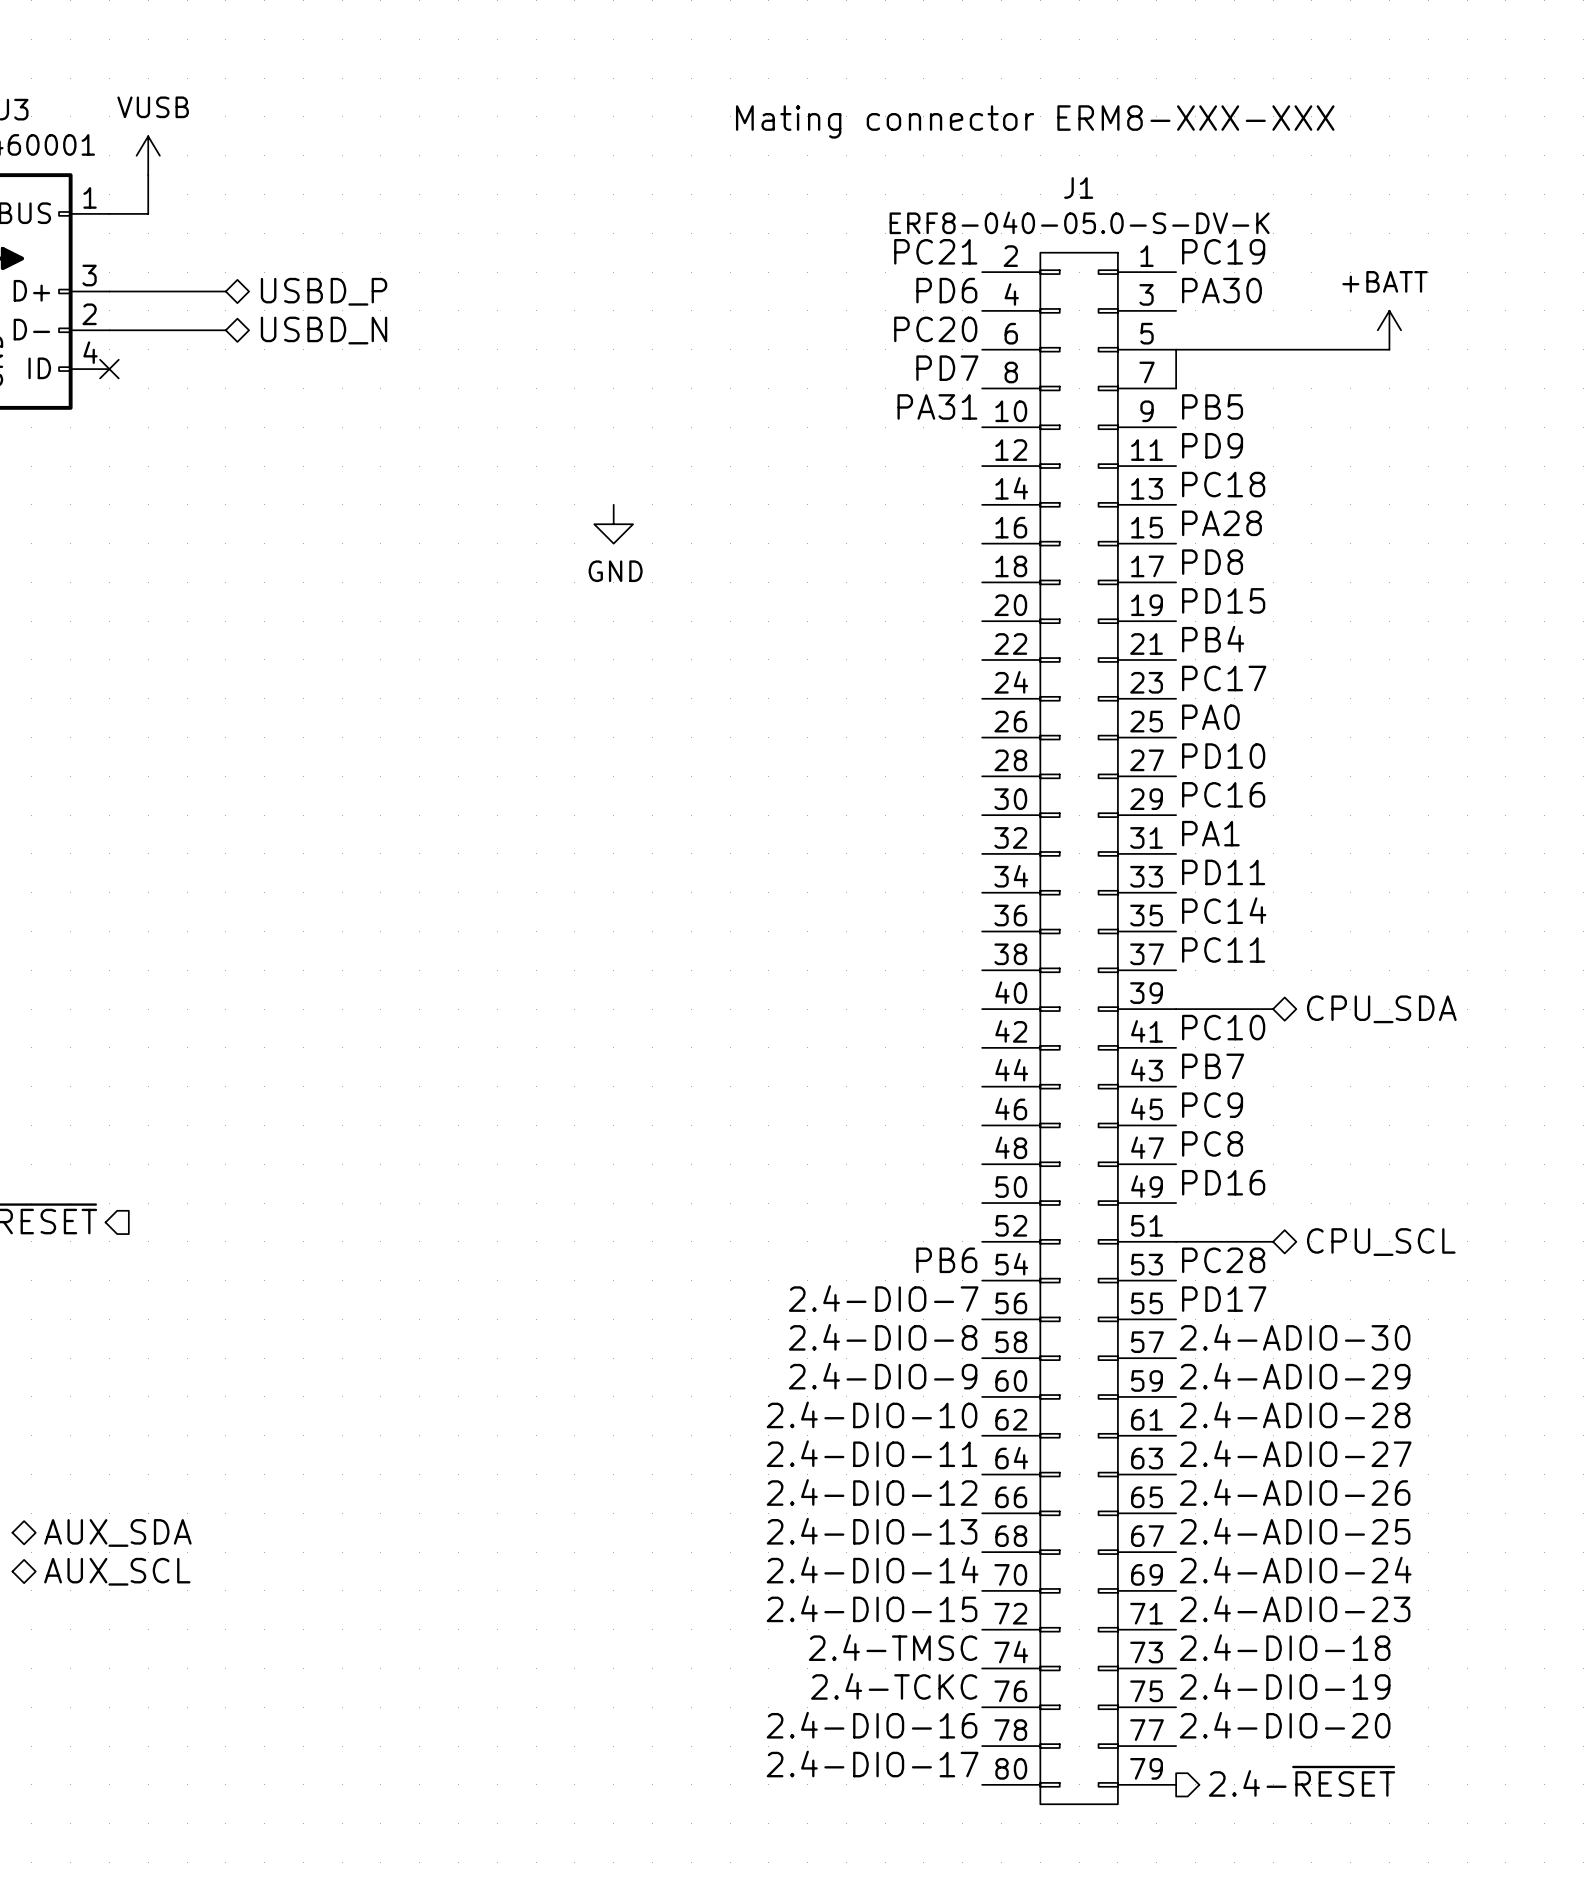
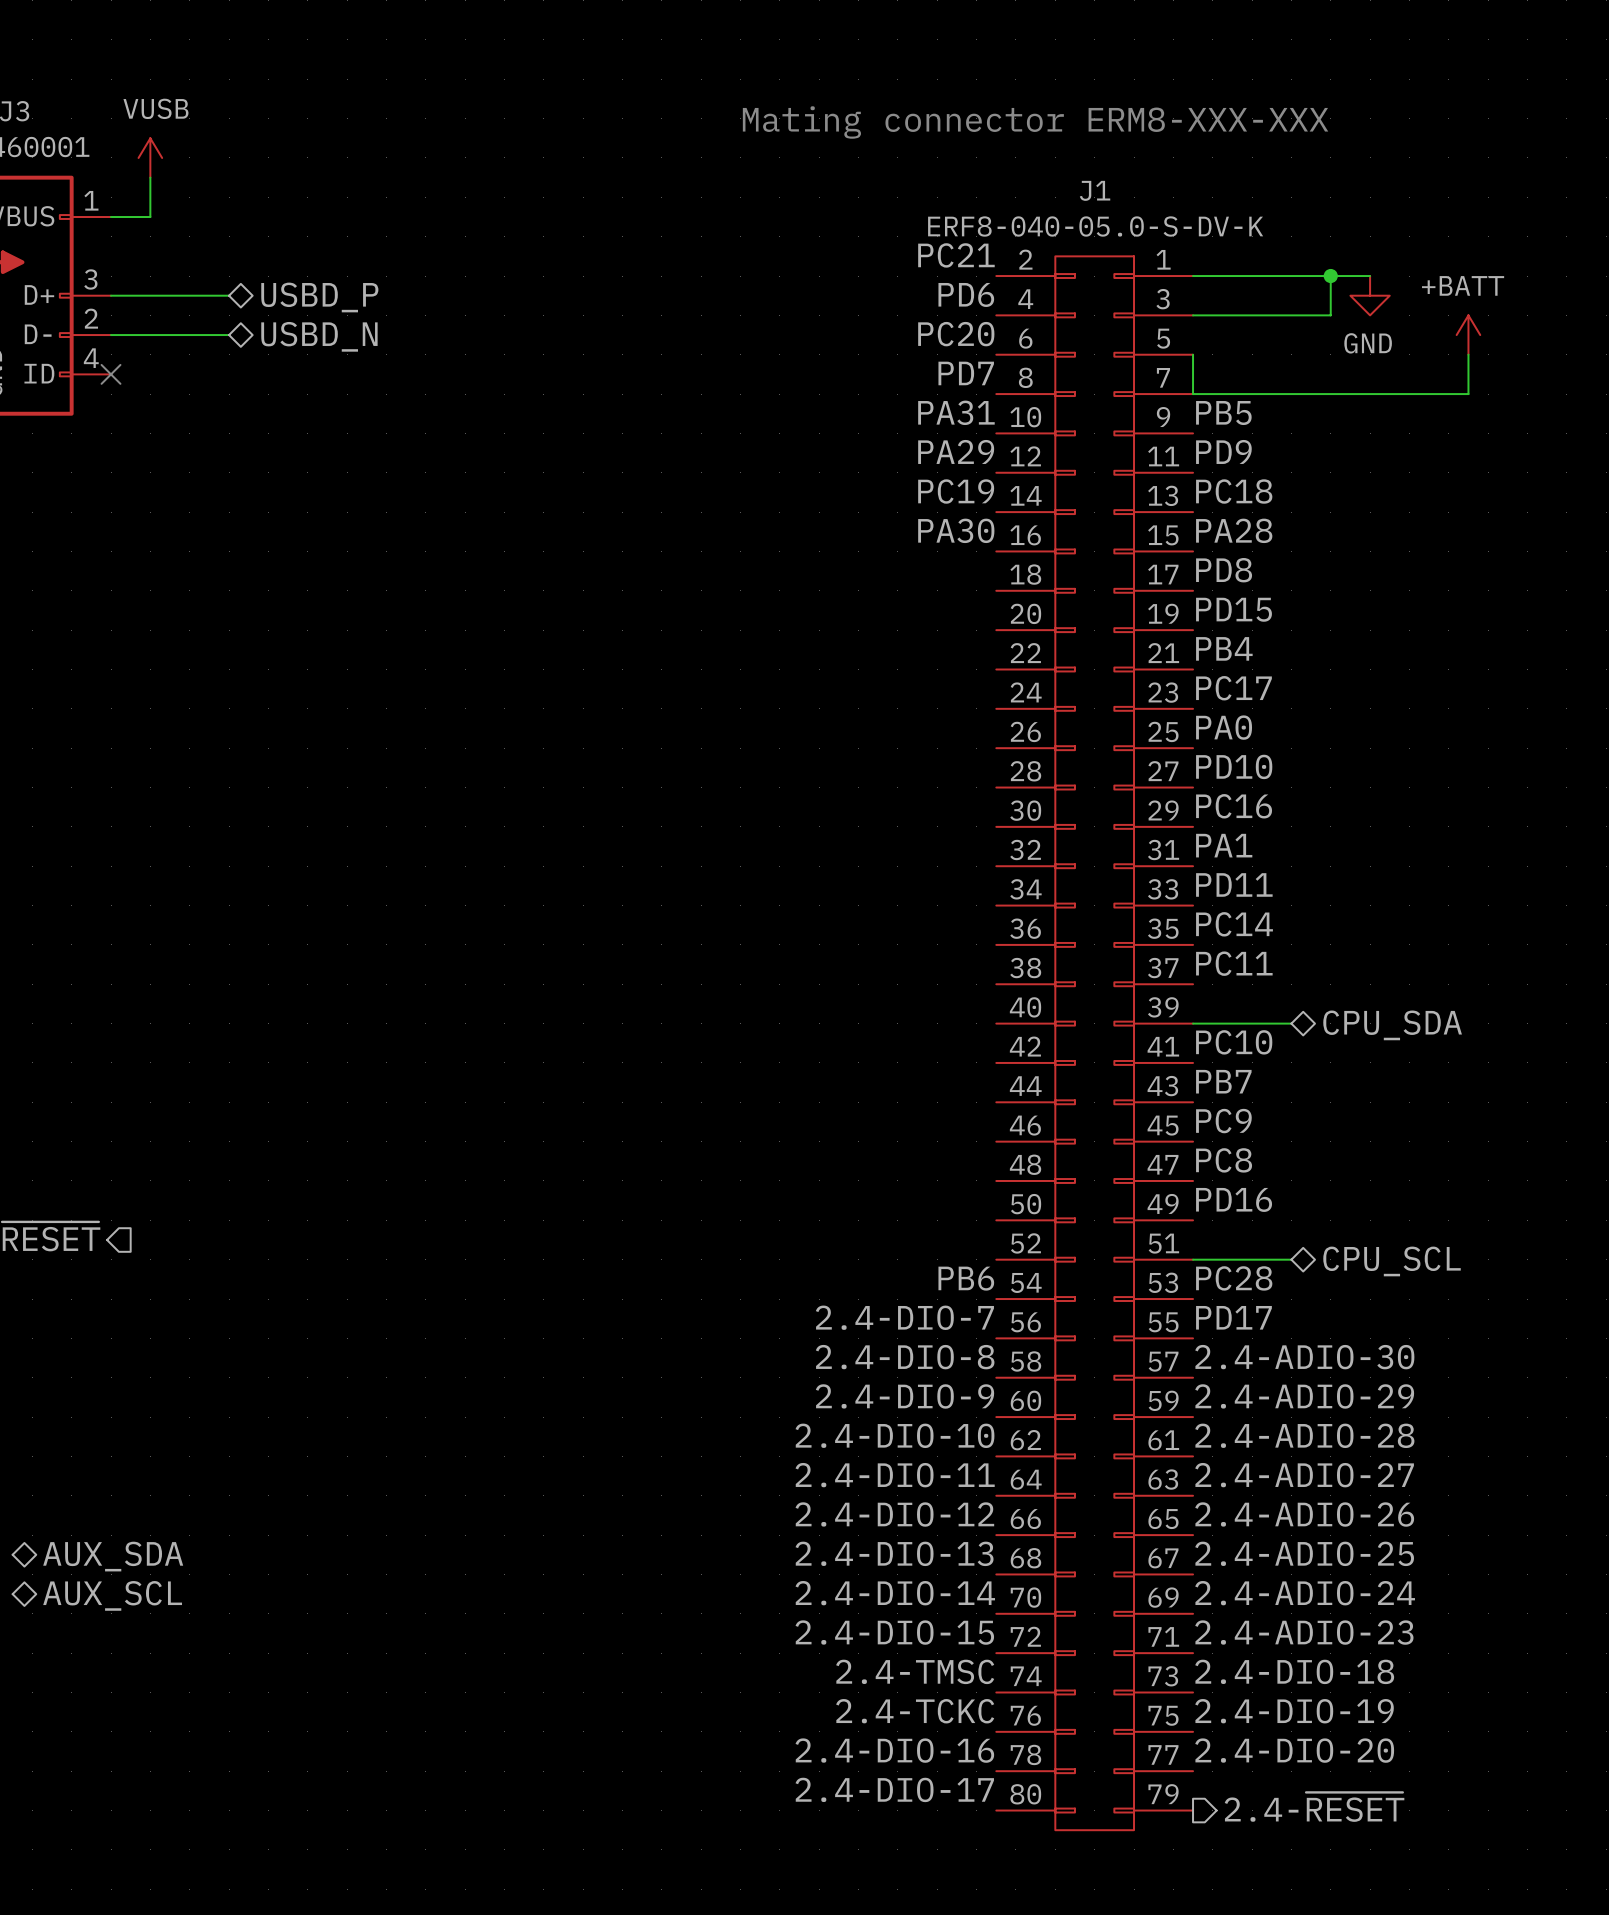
label position: PC19 (1223, 251) -> PC19 (956, 491)
wire: none -> (1193, 276) (1370, 276)
wire: none -> (1330, 276) (1330, 315) (1193, 315)
junction: none -> (1330, 276)
label position: PA30 (1221, 290) -> PA30 (956, 530)
power symbol: none -> GND (1370, 295)
power symbol position: +BATT (1389, 330) -> +BATT (1468, 335)
wire: (1176, 349) (1389, 349) -> none
wire: none -> (1468, 354) (1468, 394) (1193, 394)
label: none -> PA29 (956, 451)
power symbol: GND (613, 524) -> none

